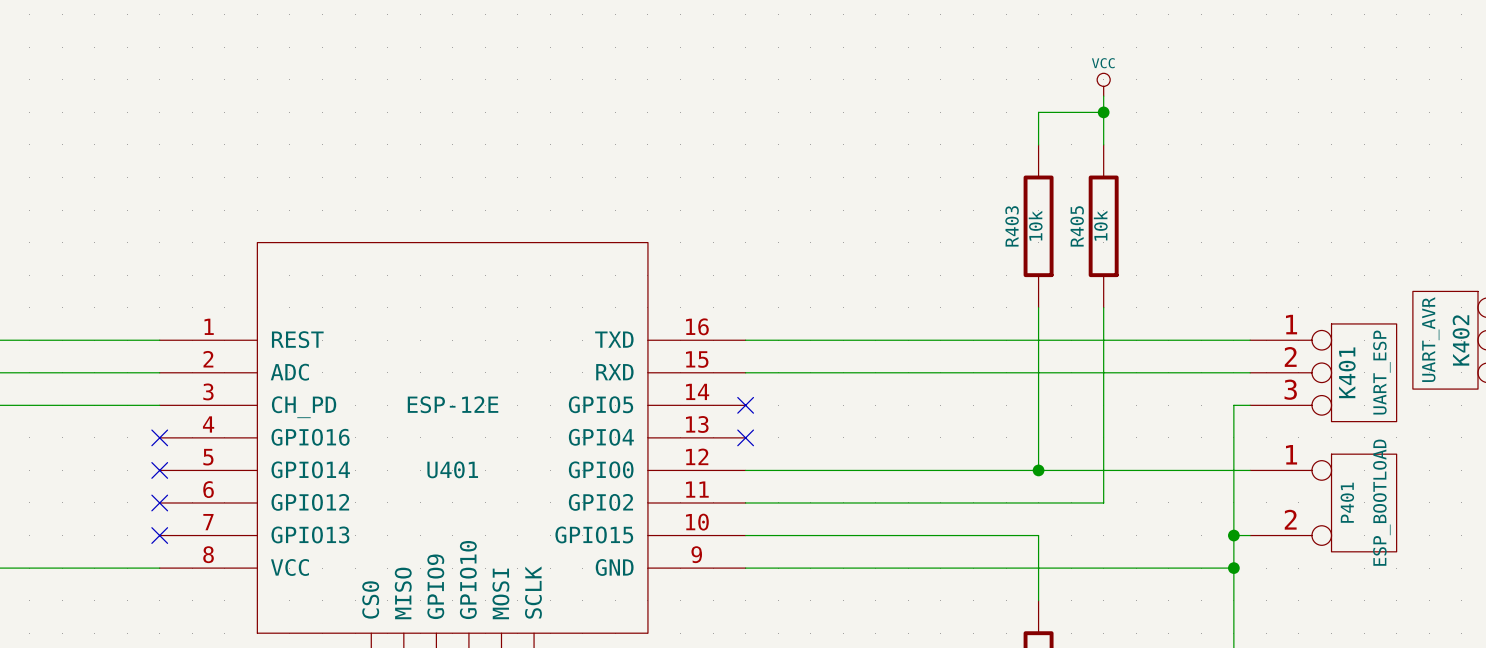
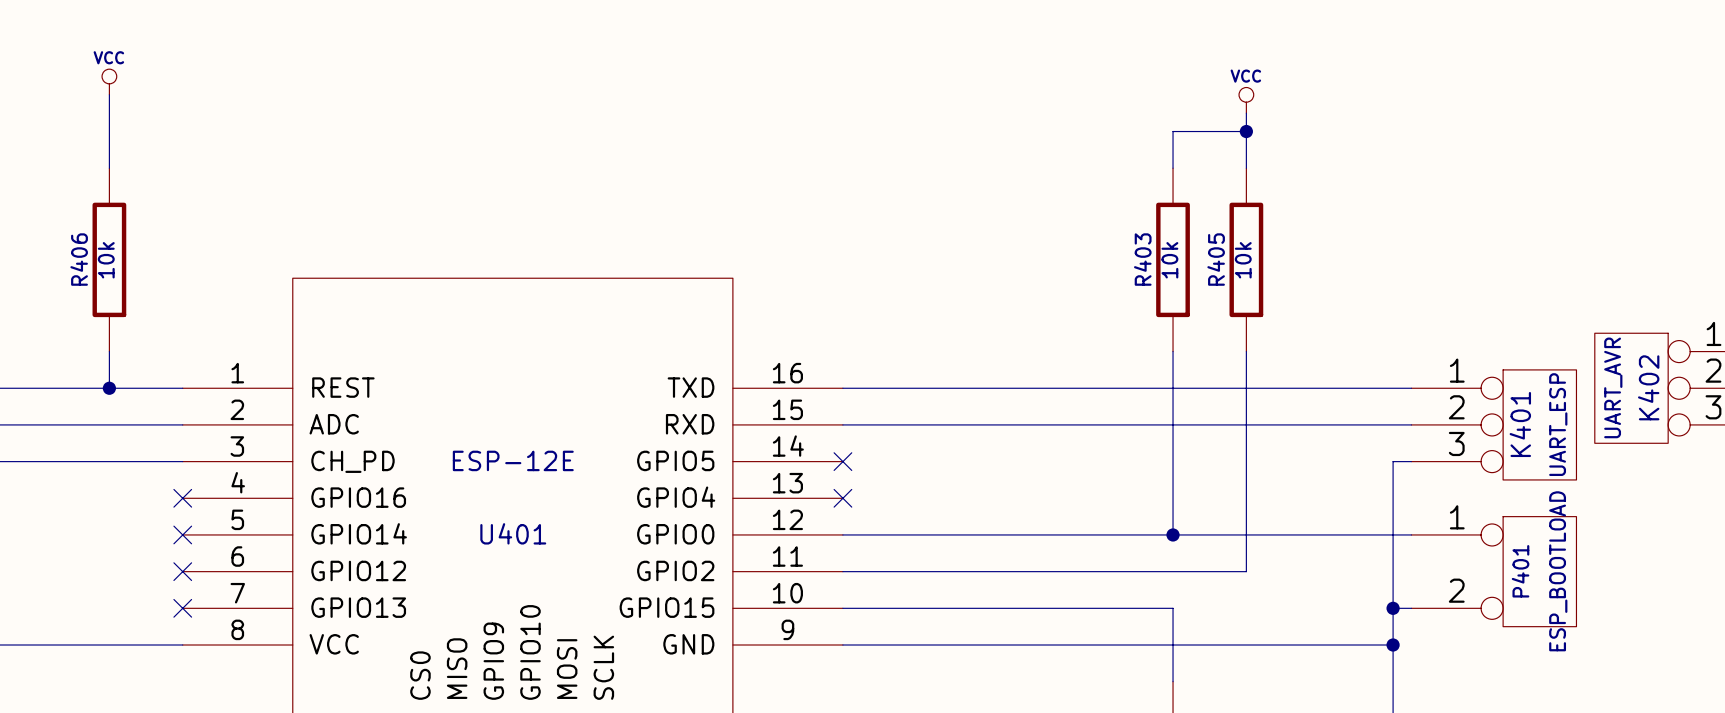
power symbol: none -> VCC (109, 82)
wire: none -> (109, 94) (109, 168)
R406: none -> 10k (109, 259)
wire: none -> (109, 351) (109, 388)
junction: none -> (109, 388)

